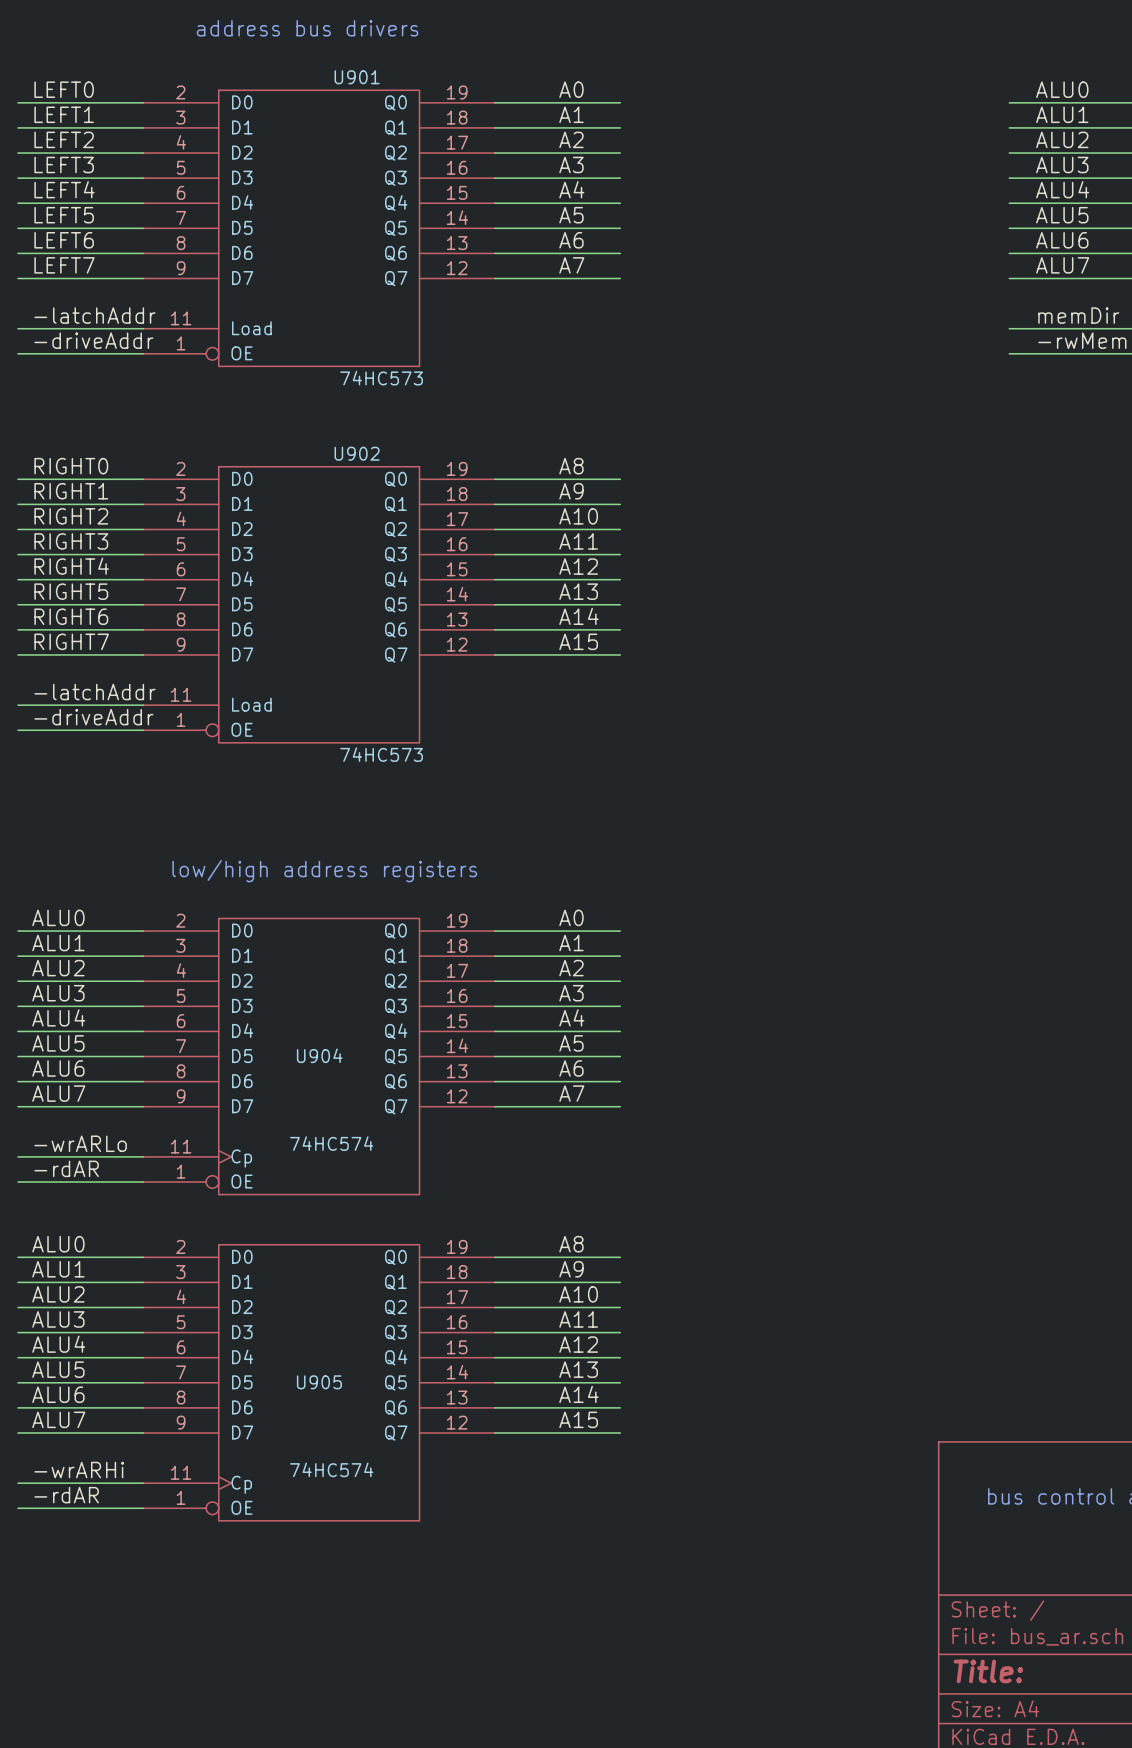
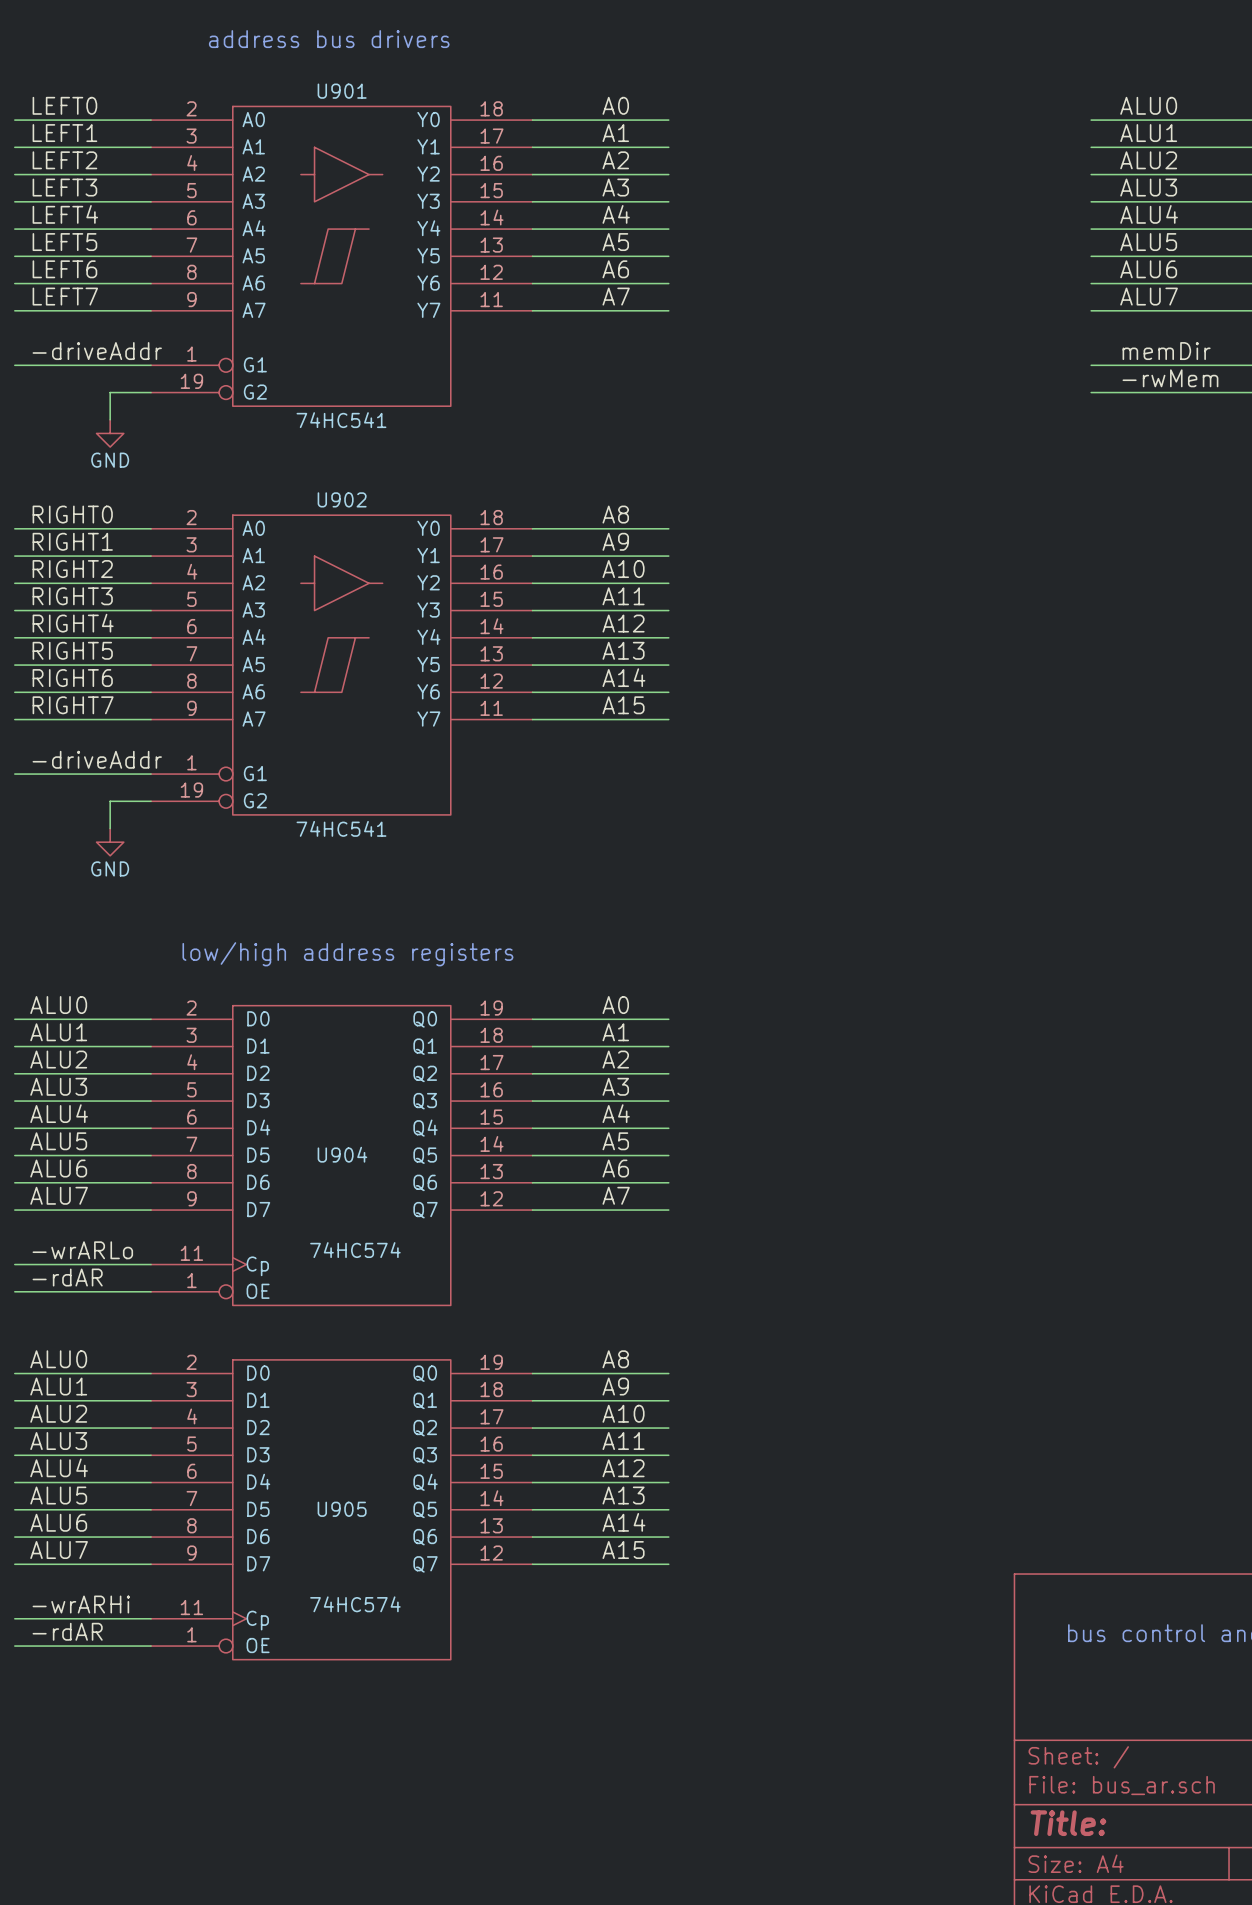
U901 name position: U901 (357, 77) -> U901 (342, 91)
U901 symbol: [143, 90, 495, 367] -> [151, 106, 533, 407]
label: -latchAddr (94, 315) -> -driveAddr (97, 351)
label: -driveAddr (93, 340) -> none
wire: (17, 353) (105, 353) -> (110, 419) (110, 392)
U901 value: 74HC573 (381, 378) -> 74HC541 (341, 420)
power symbol: none -> GND (110, 433)
U902 name position: U902 (357, 453) -> U902 (342, 499)
U902 symbol: [143, 466, 495, 743] -> [151, 515, 533, 815]
label: -latchAddr (94, 692) -> -driveAddr (97, 759)
label: -driveAddr (93, 717) -> none
wire: (17, 730) (105, 730) -> (110, 828) (110, 801)
U902 value: 74HC573 (381, 754) -> 74HC541 (341, 828)
power symbol: none -> GND (110, 842)

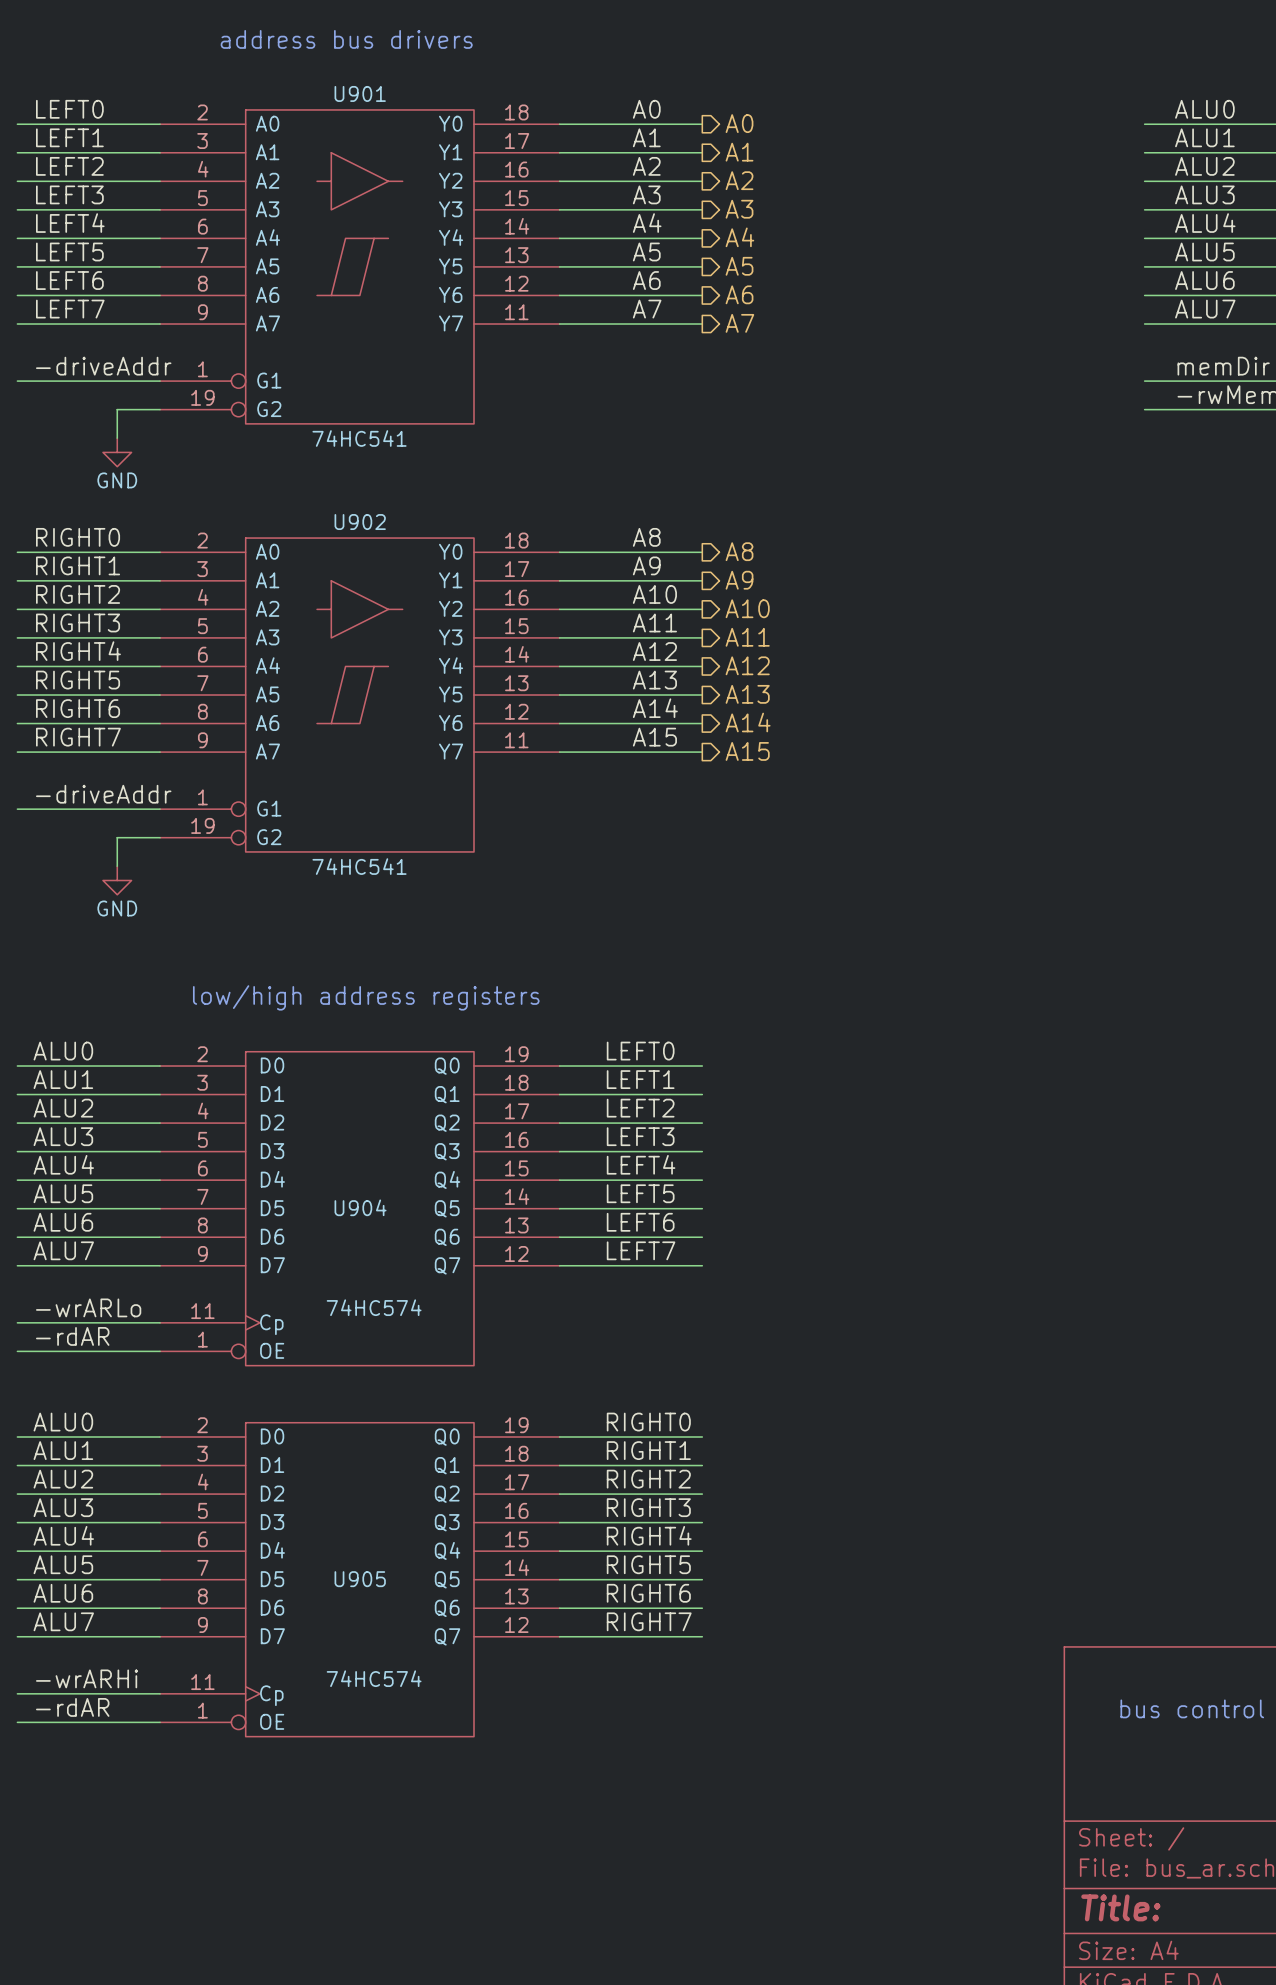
hierarchical label: none -> A0 (739, 123)
hierarchical label: none -> A1 (739, 152)
hierarchical label: none -> A2 (739, 180)
hierarchical label: none -> A3 (739, 209)
hierarchical label: none -> A4 (739, 237)
hierarchical label: none -> A5 (739, 266)
hierarchical label: none -> A6 (739, 294)
hierarchical label: none -> A7 (739, 323)
hierarchical label: none -> A8 (739, 551)
hierarchical label: none -> A9 (739, 580)
hierarchical label: none -> A10 (747, 608)
hierarchical label: none -> A11 (747, 637)
hierarchical label: none -> A12 (747, 665)
hierarchical label: none -> A13 (747, 694)
hierarchical label: none -> A14 (748, 722)
hierarchical label: none -> A15 (747, 751)
label: none -> LEFT0 (640, 1051)
label: A0 (615, 1005) -> none
label: none -> LEFT1 (640, 1079)
label: A1 (615, 1032) -> none
label: none -> LEFT2 (640, 1108)
label: A2 (615, 1059) -> none
label: none -> LEFT3 (640, 1136)
label: A3 (615, 1086) -> none
label: none -> LEFT4 (641, 1164)
label: A4 (616, 1113) -> none
label: none -> LEFT5 (640, 1193)
label: A5 (615, 1141) -> none
label: none -> LEFT6 (640, 1222)
label: A6 (615, 1168) -> none
label: none -> LEFT7 (641, 1250)
label: A7 (616, 1195) -> none
label: A8 (615, 1359) -> none
label: none -> RIGHT0 (648, 1422)
label: A9 (615, 1386) -> none
label: none -> RIGHT1 (648, 1450)
label: none -> RIGHT2 (648, 1479)
label: A10 (623, 1413) -> none
label: none -> RIGHT3 (648, 1507)
label: A11 (623, 1441) -> none
label: none -> RIGHT4 (649, 1535)
label: A12 (623, 1468) -> none
label: none -> RIGHT5 (648, 1564)
label: A13 (623, 1495) -> none
label: none -> RIGHT6 (648, 1593)
label: A14 (623, 1522) -> none
label: none -> RIGHT7 (649, 1621)
label: A15 (623, 1550) -> none

